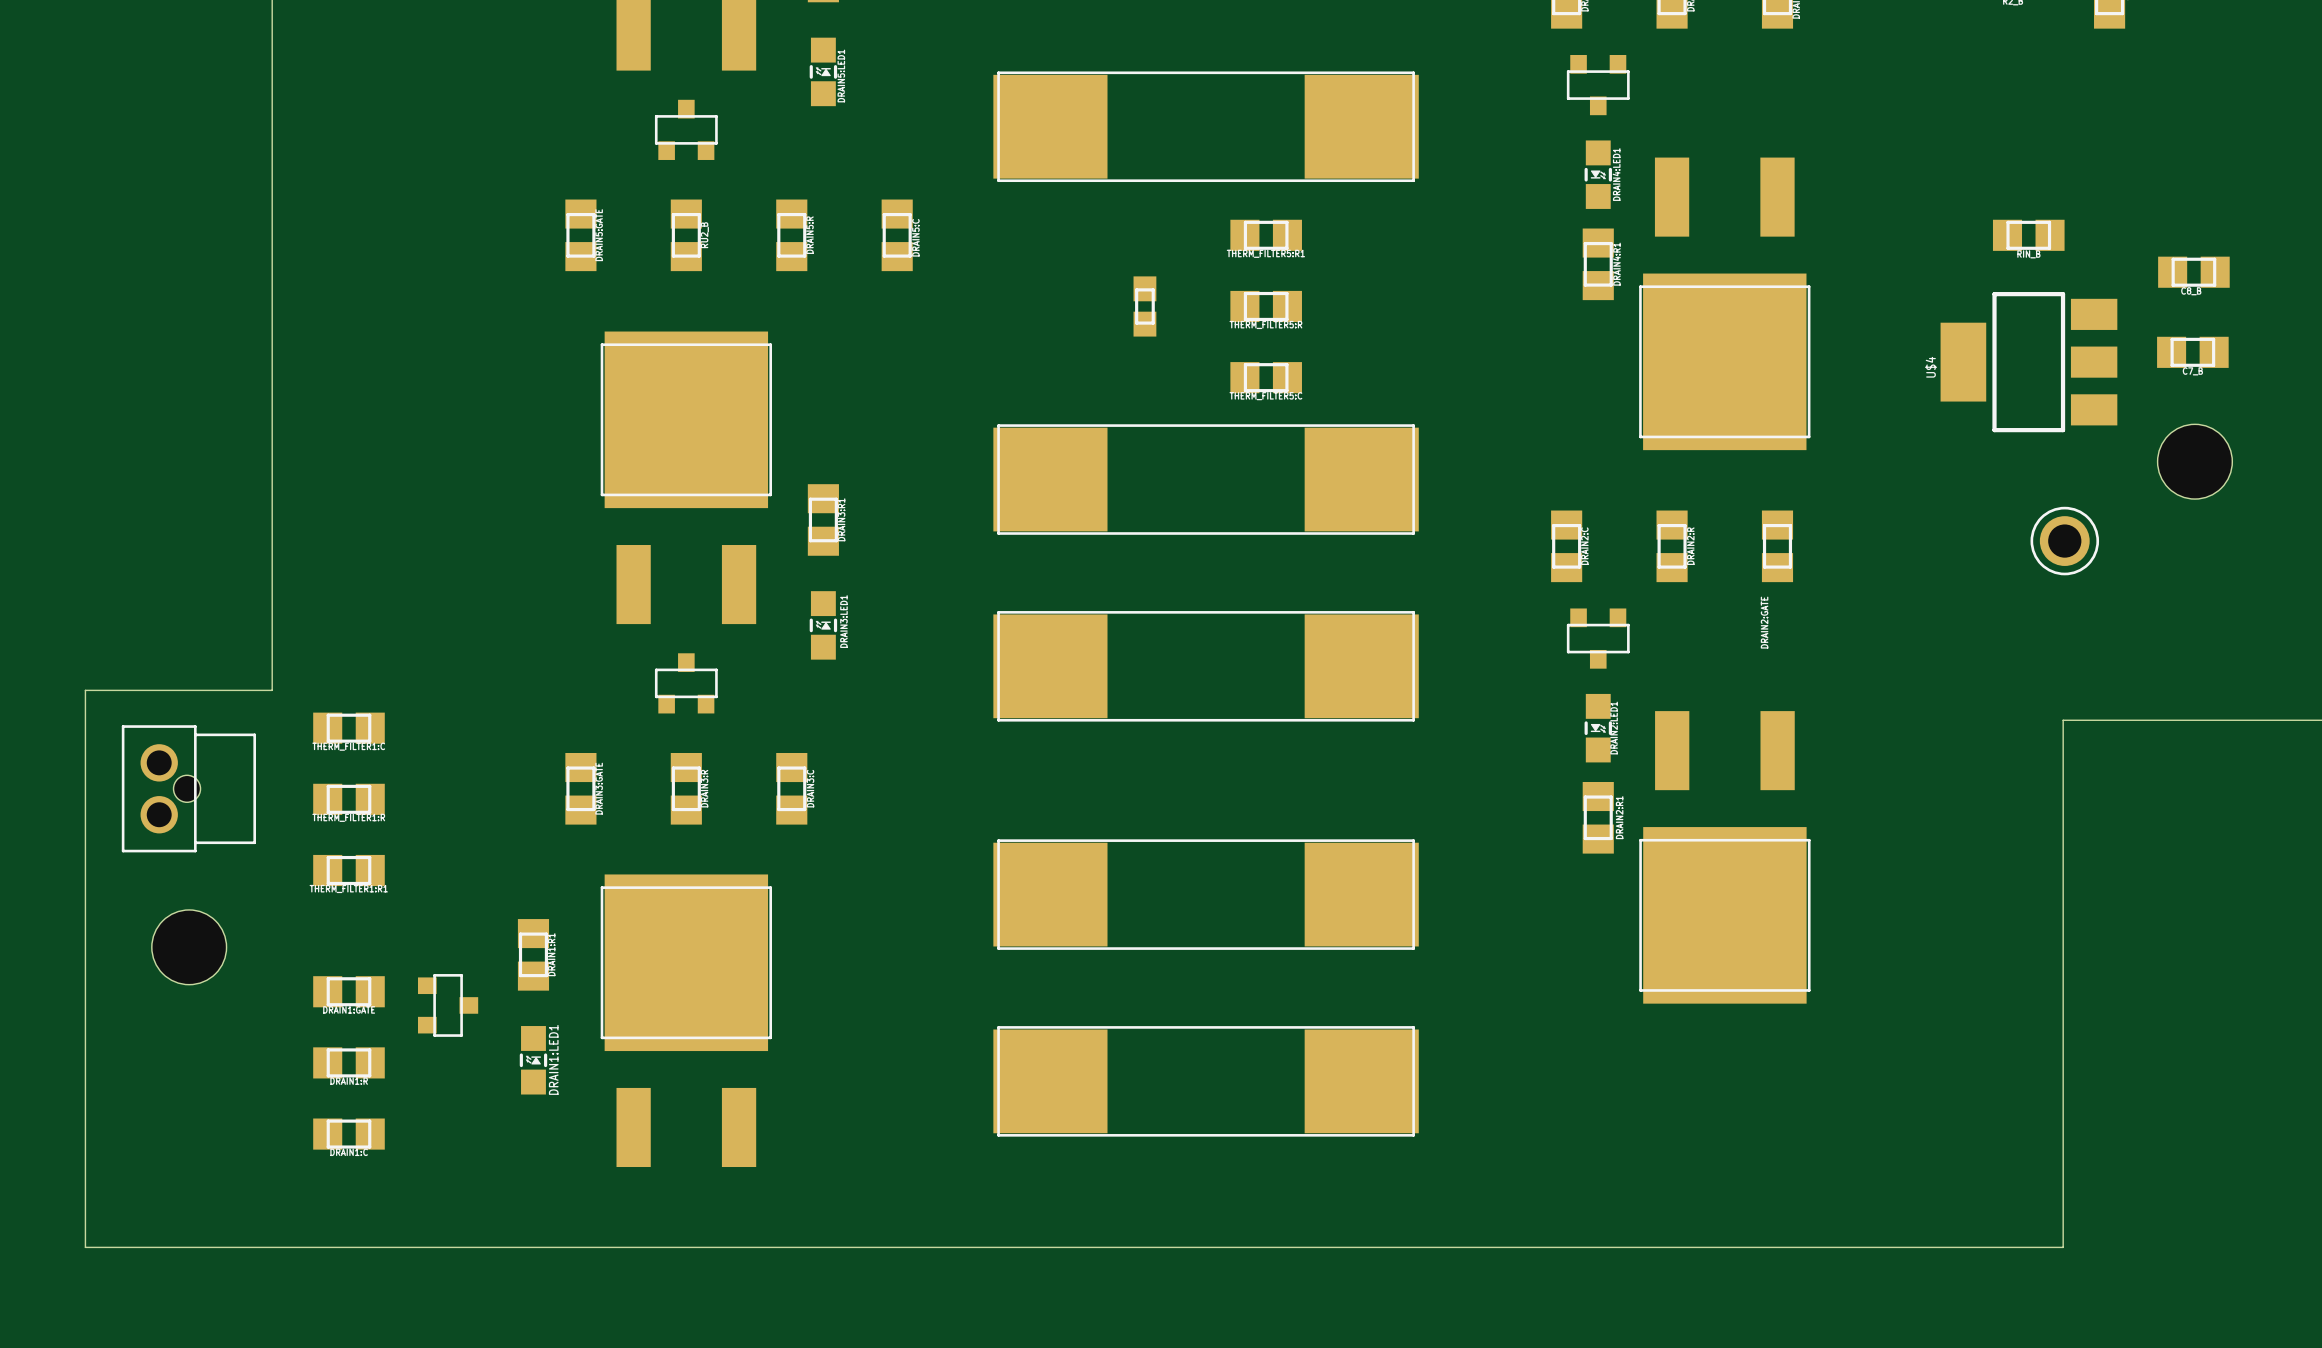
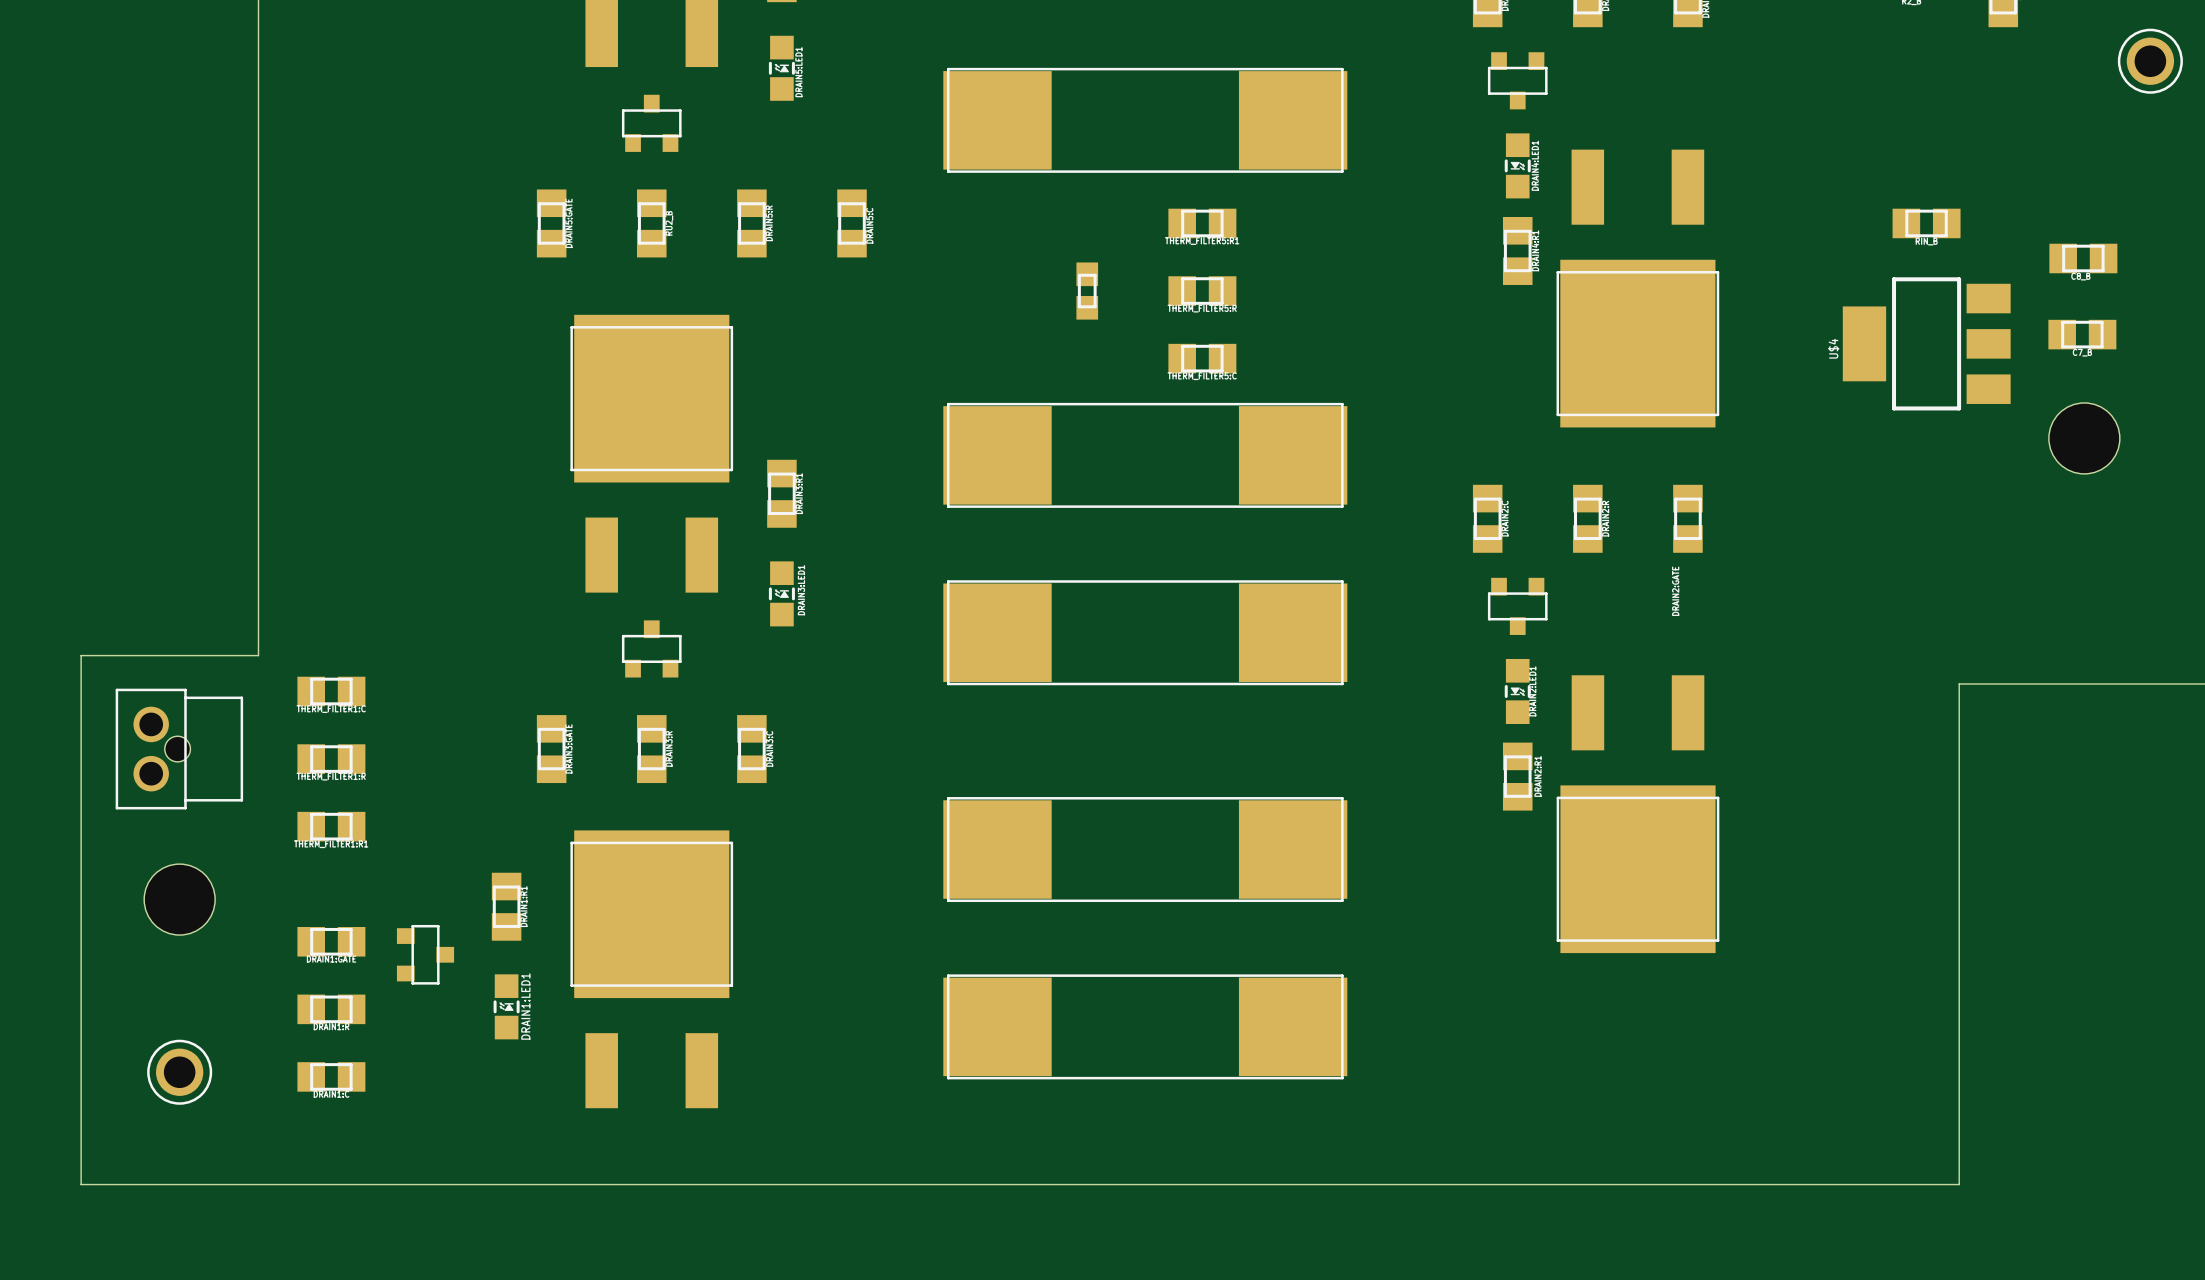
part position: (2064, 541) -> (2150, 61)
part: none -> (179, 1072)

